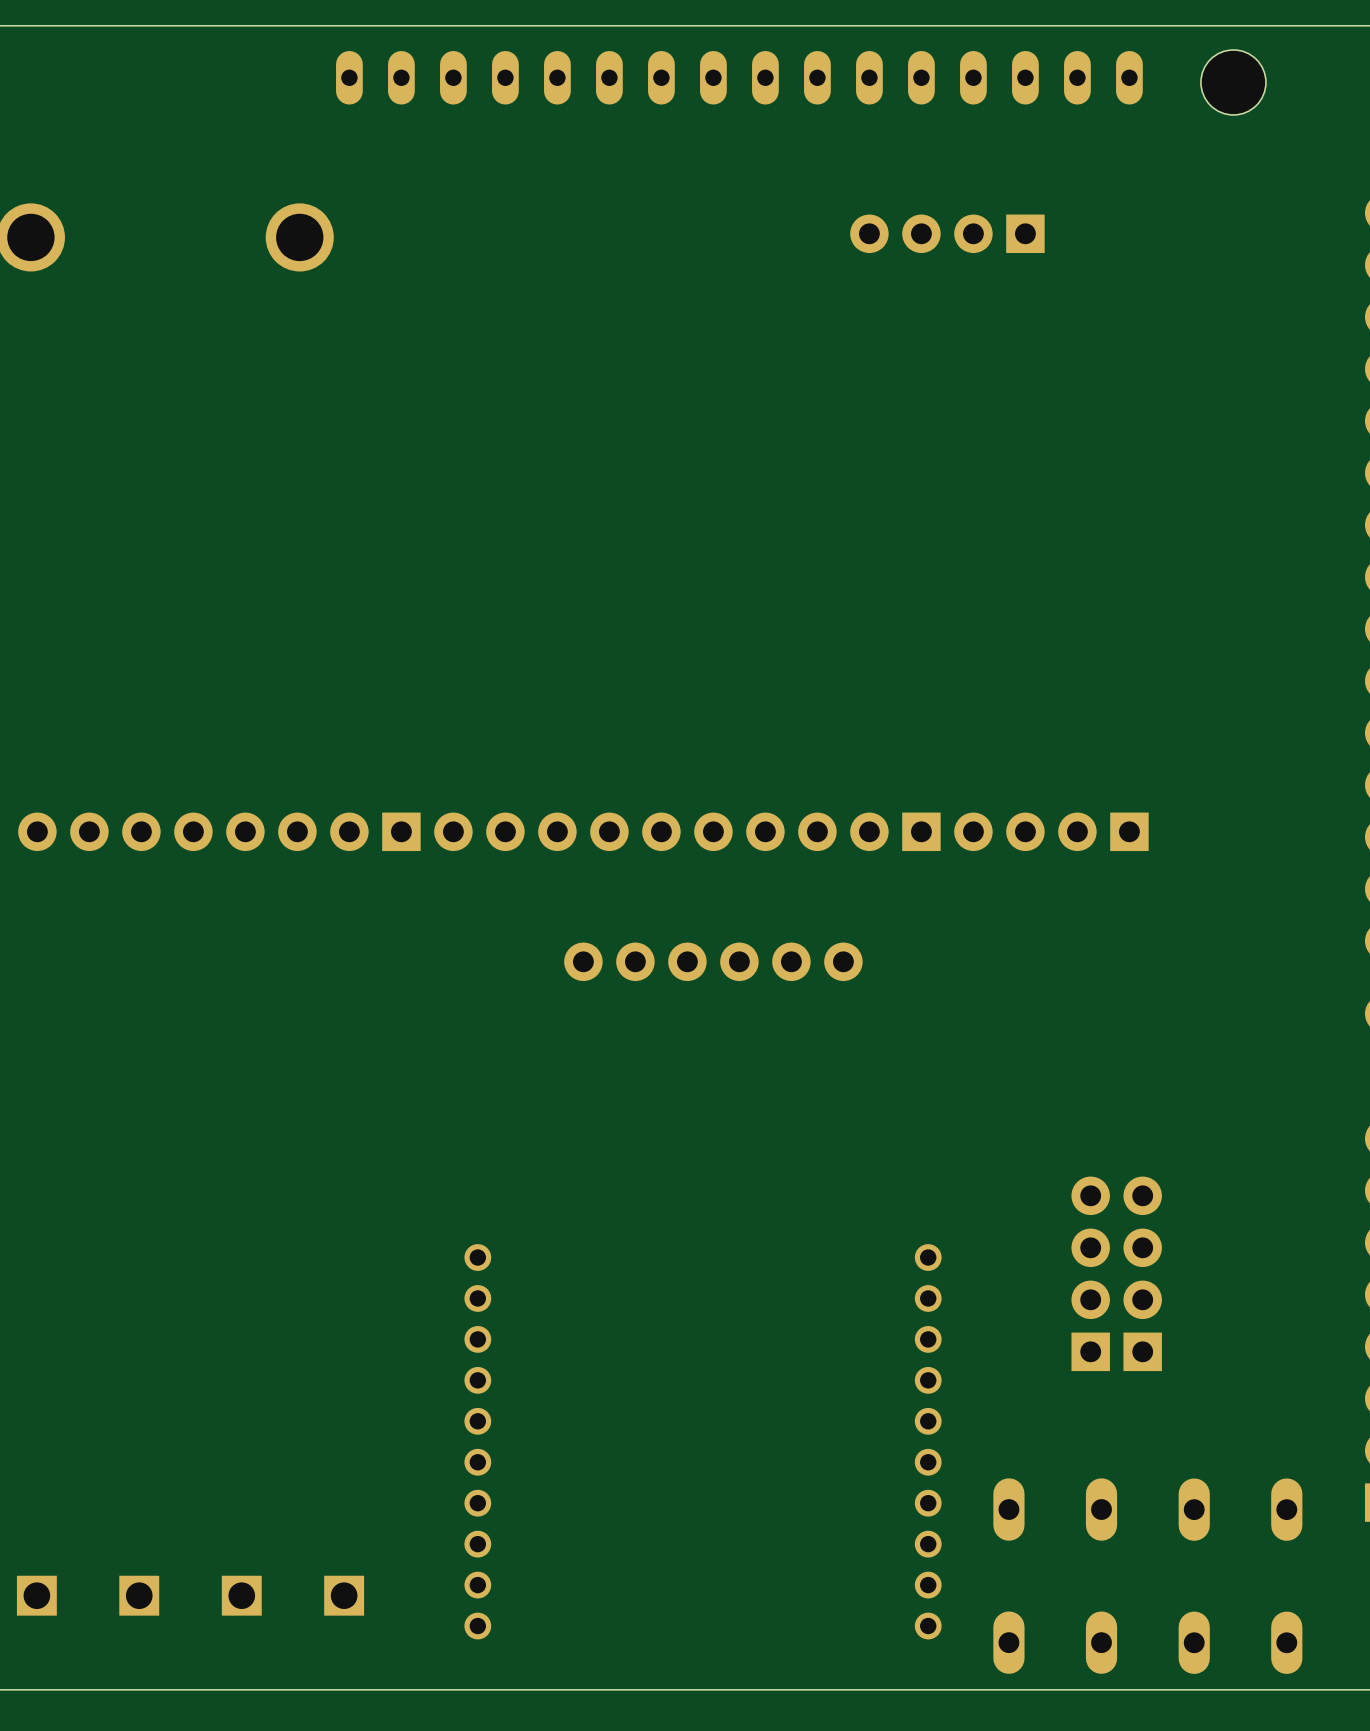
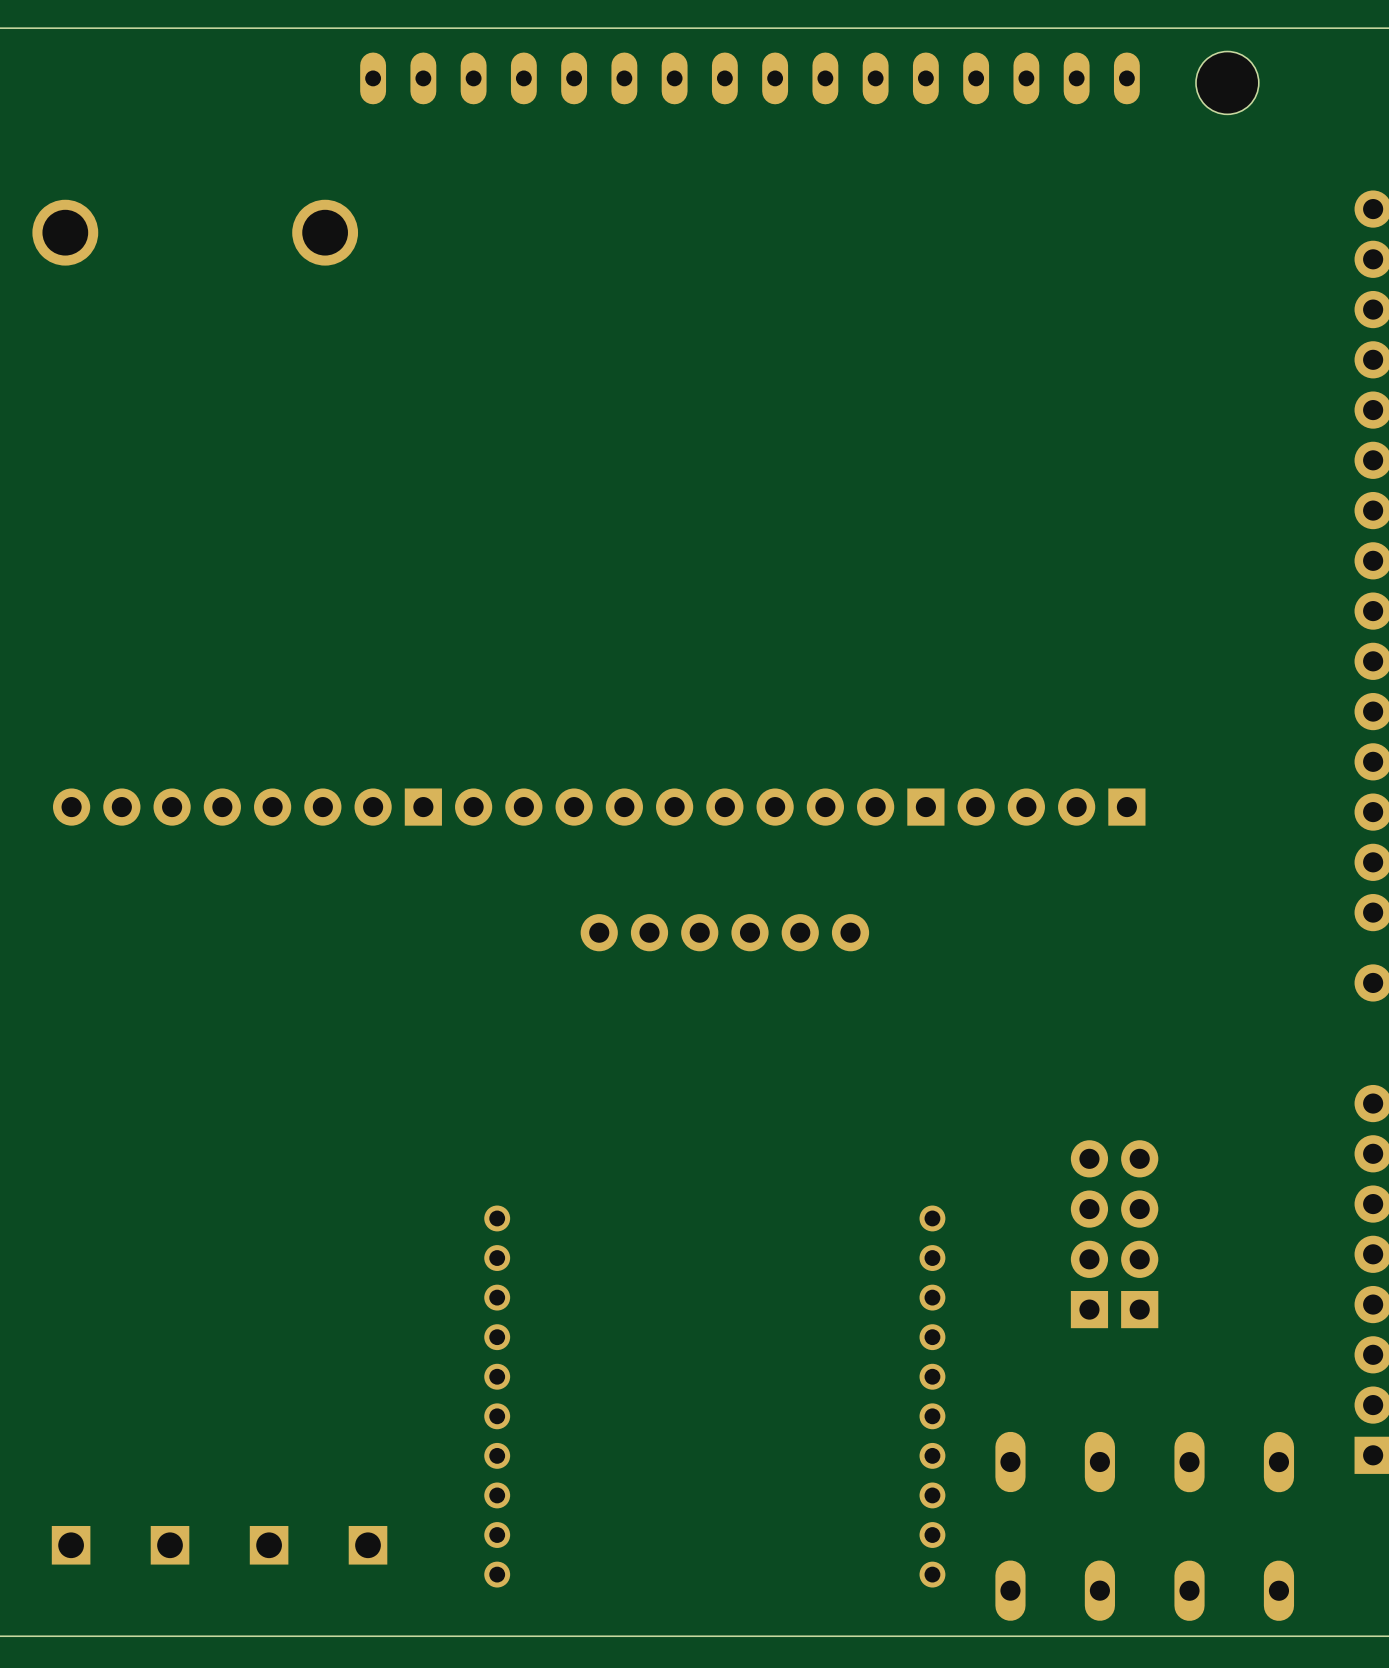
part: (947, 233) -> none

